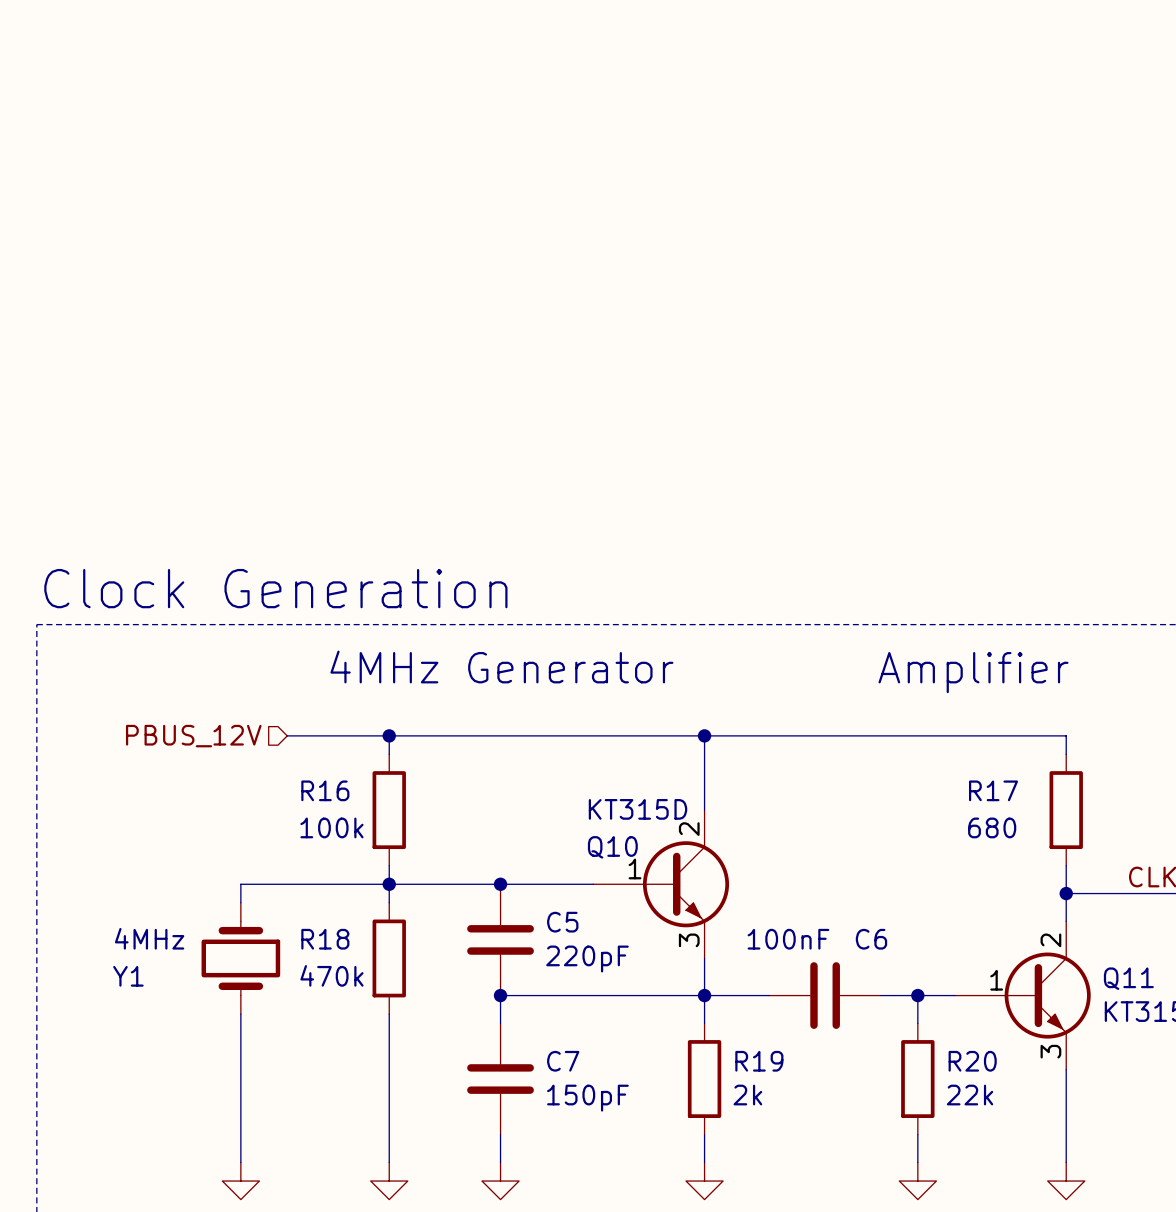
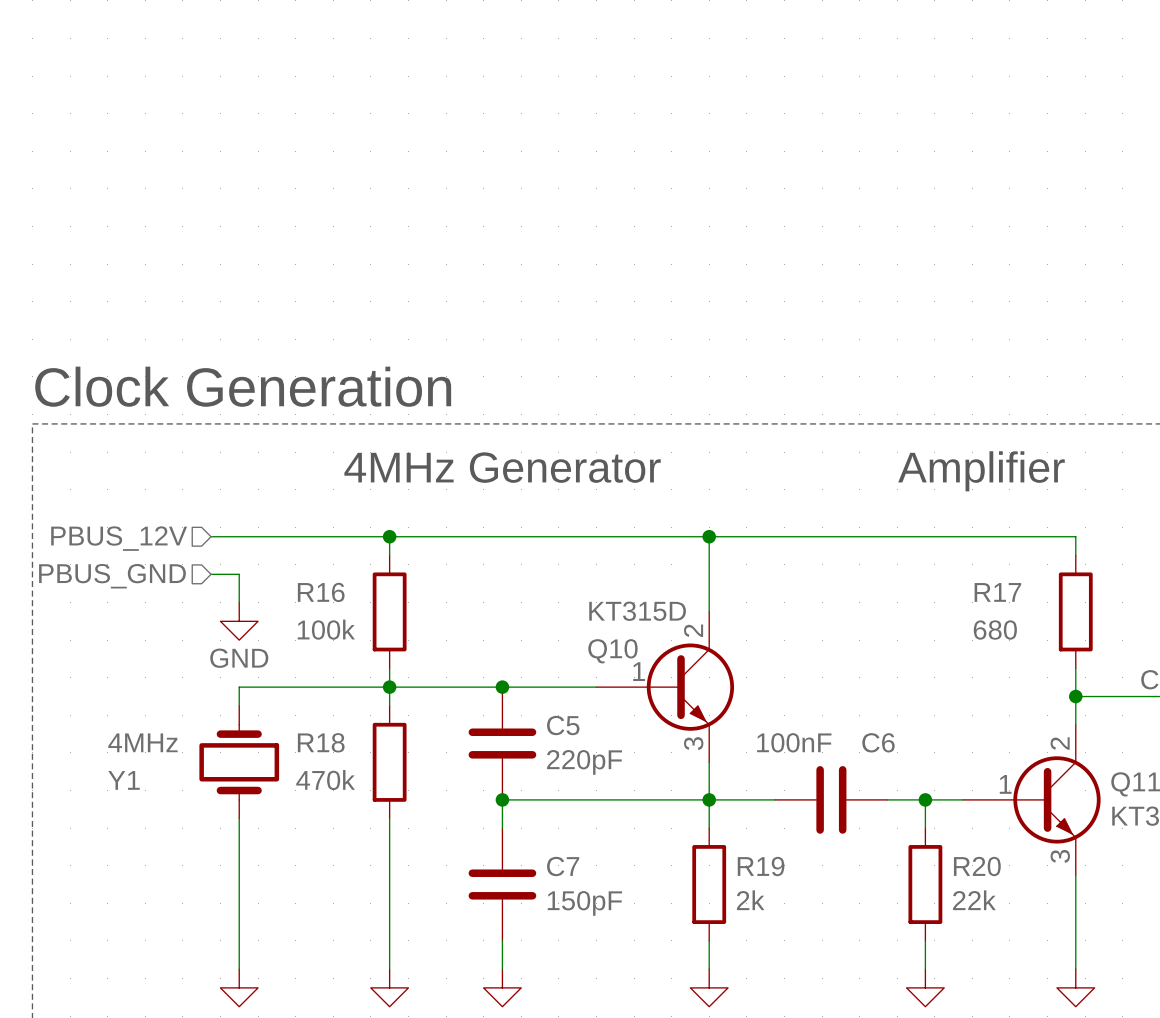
wire: none -> (211, 536) (286, 536)
hierarchical label position: PBUS_12V (193, 736) -> PBUS_12V (119, 538)
wire: none -> (211, 574) (239, 574) (239, 602)
hierarchical label: none -> PBUS_GND (112, 576)
power symbol: none -> GND (239, 621)

